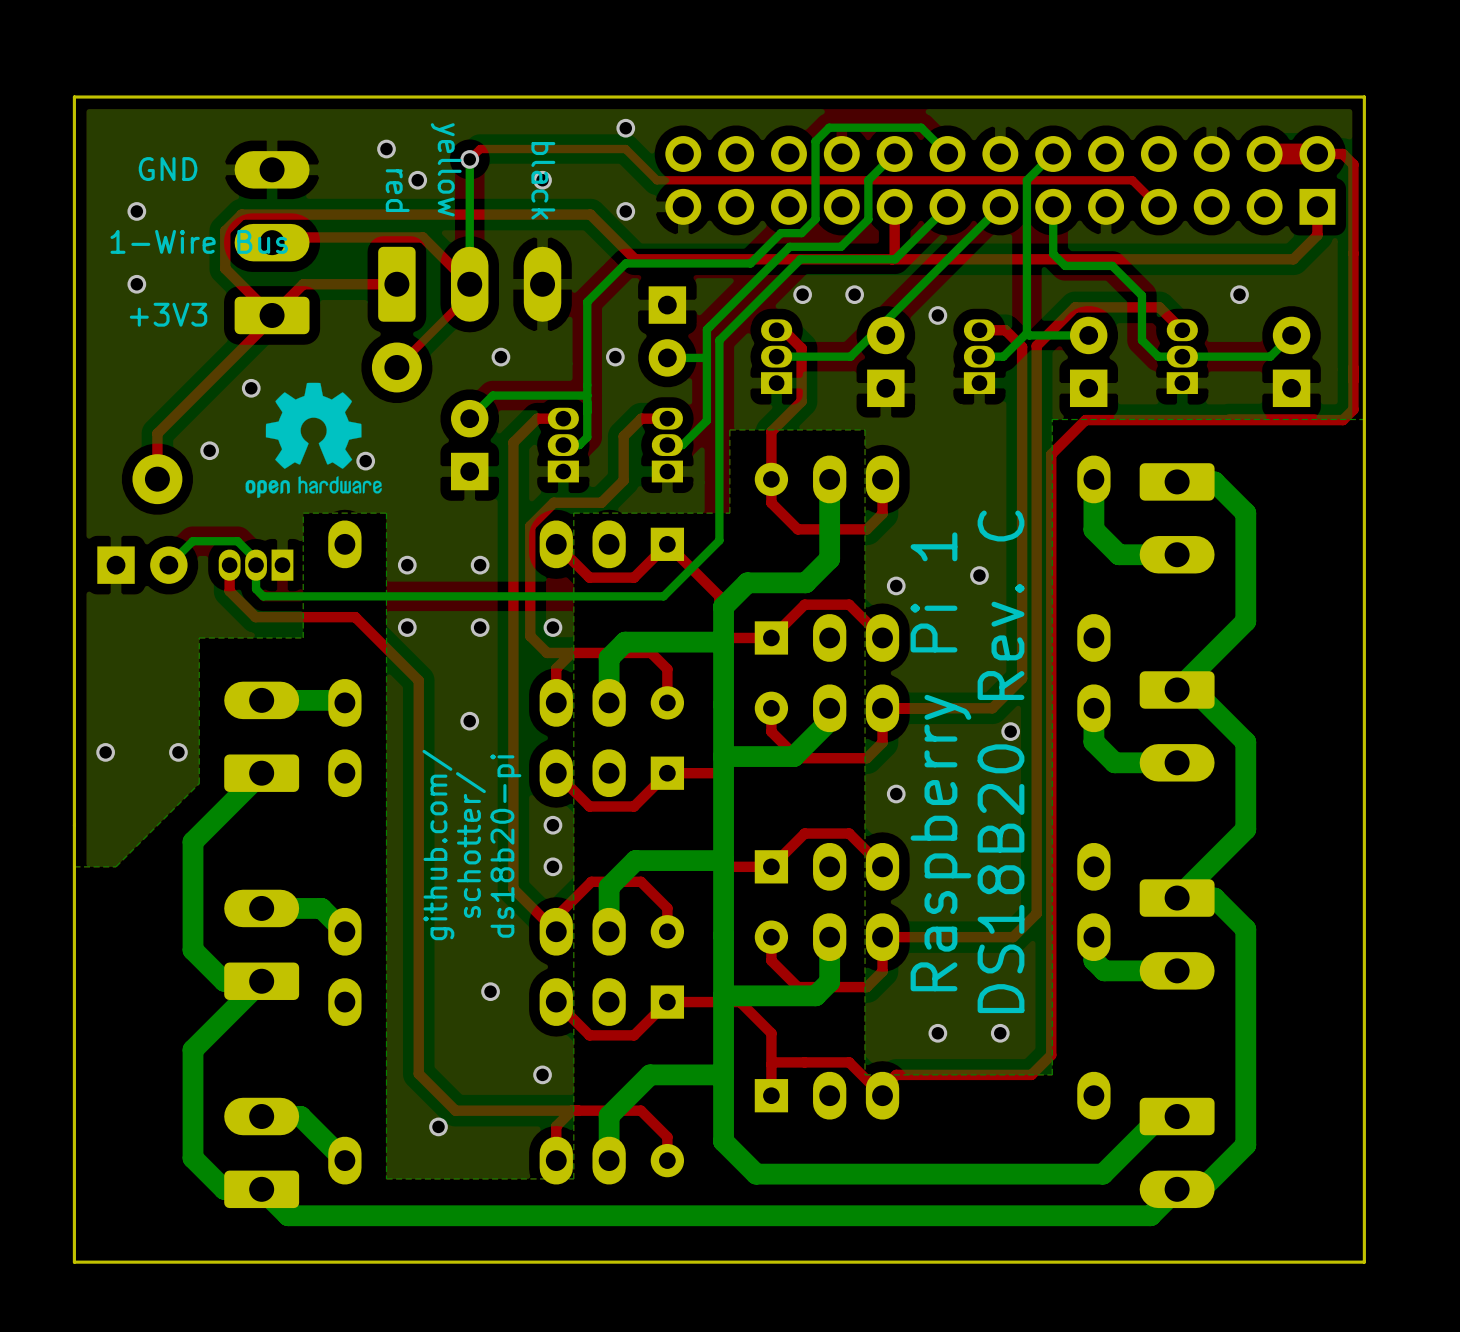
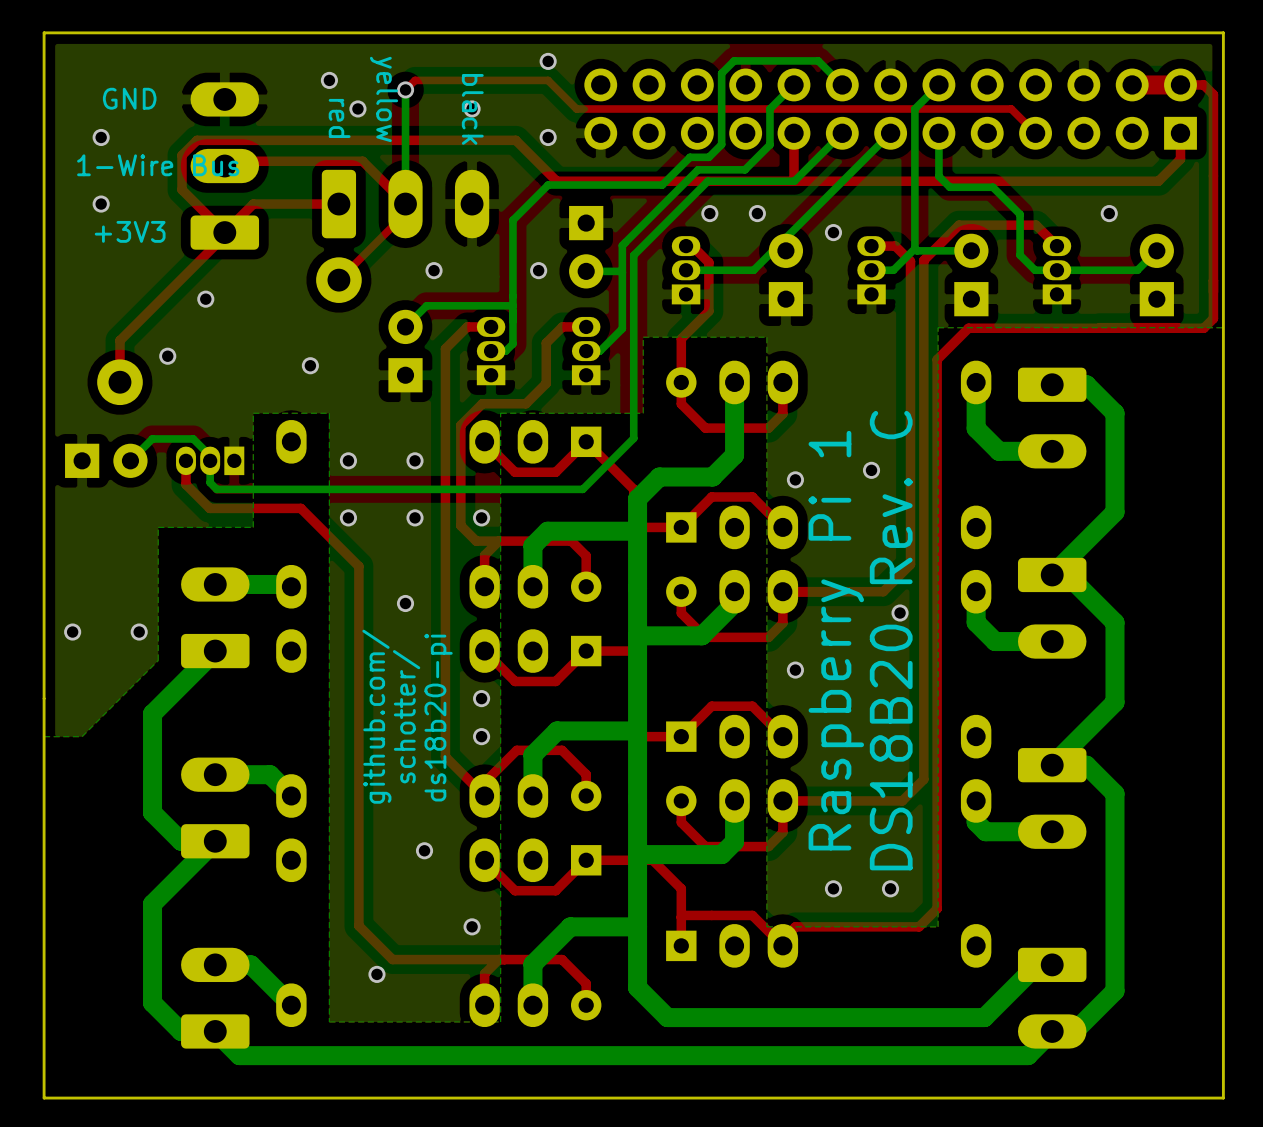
drawing: [245, 382, 382, 499] -> none

